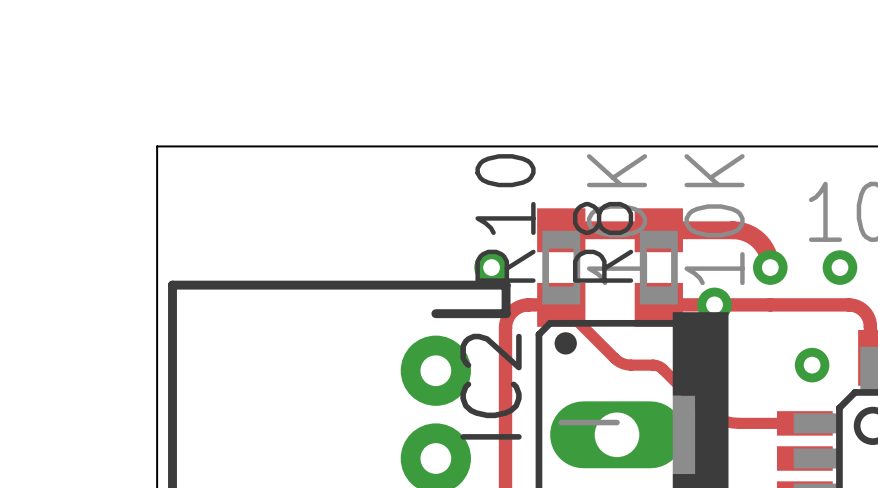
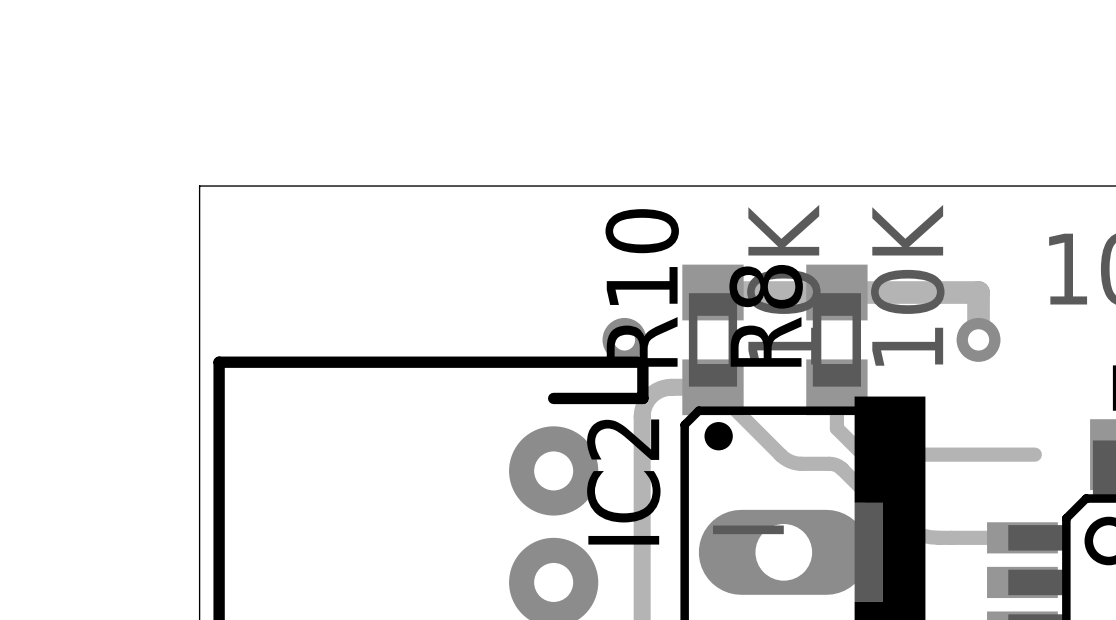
track: (732, 230) (747, 233) (759, 241) (767, 253) (770, 267) -> (931, 292) (978, 292) (978, 339)
via: (839, 267) -> none
track: (658, 304) (854, 305) (864, 311) (869, 320) (870, 365) -> (836, 387) (836, 428) (863, 454) (1034, 454)
via: (714, 304) -> none
via: (812, 365) -> none

